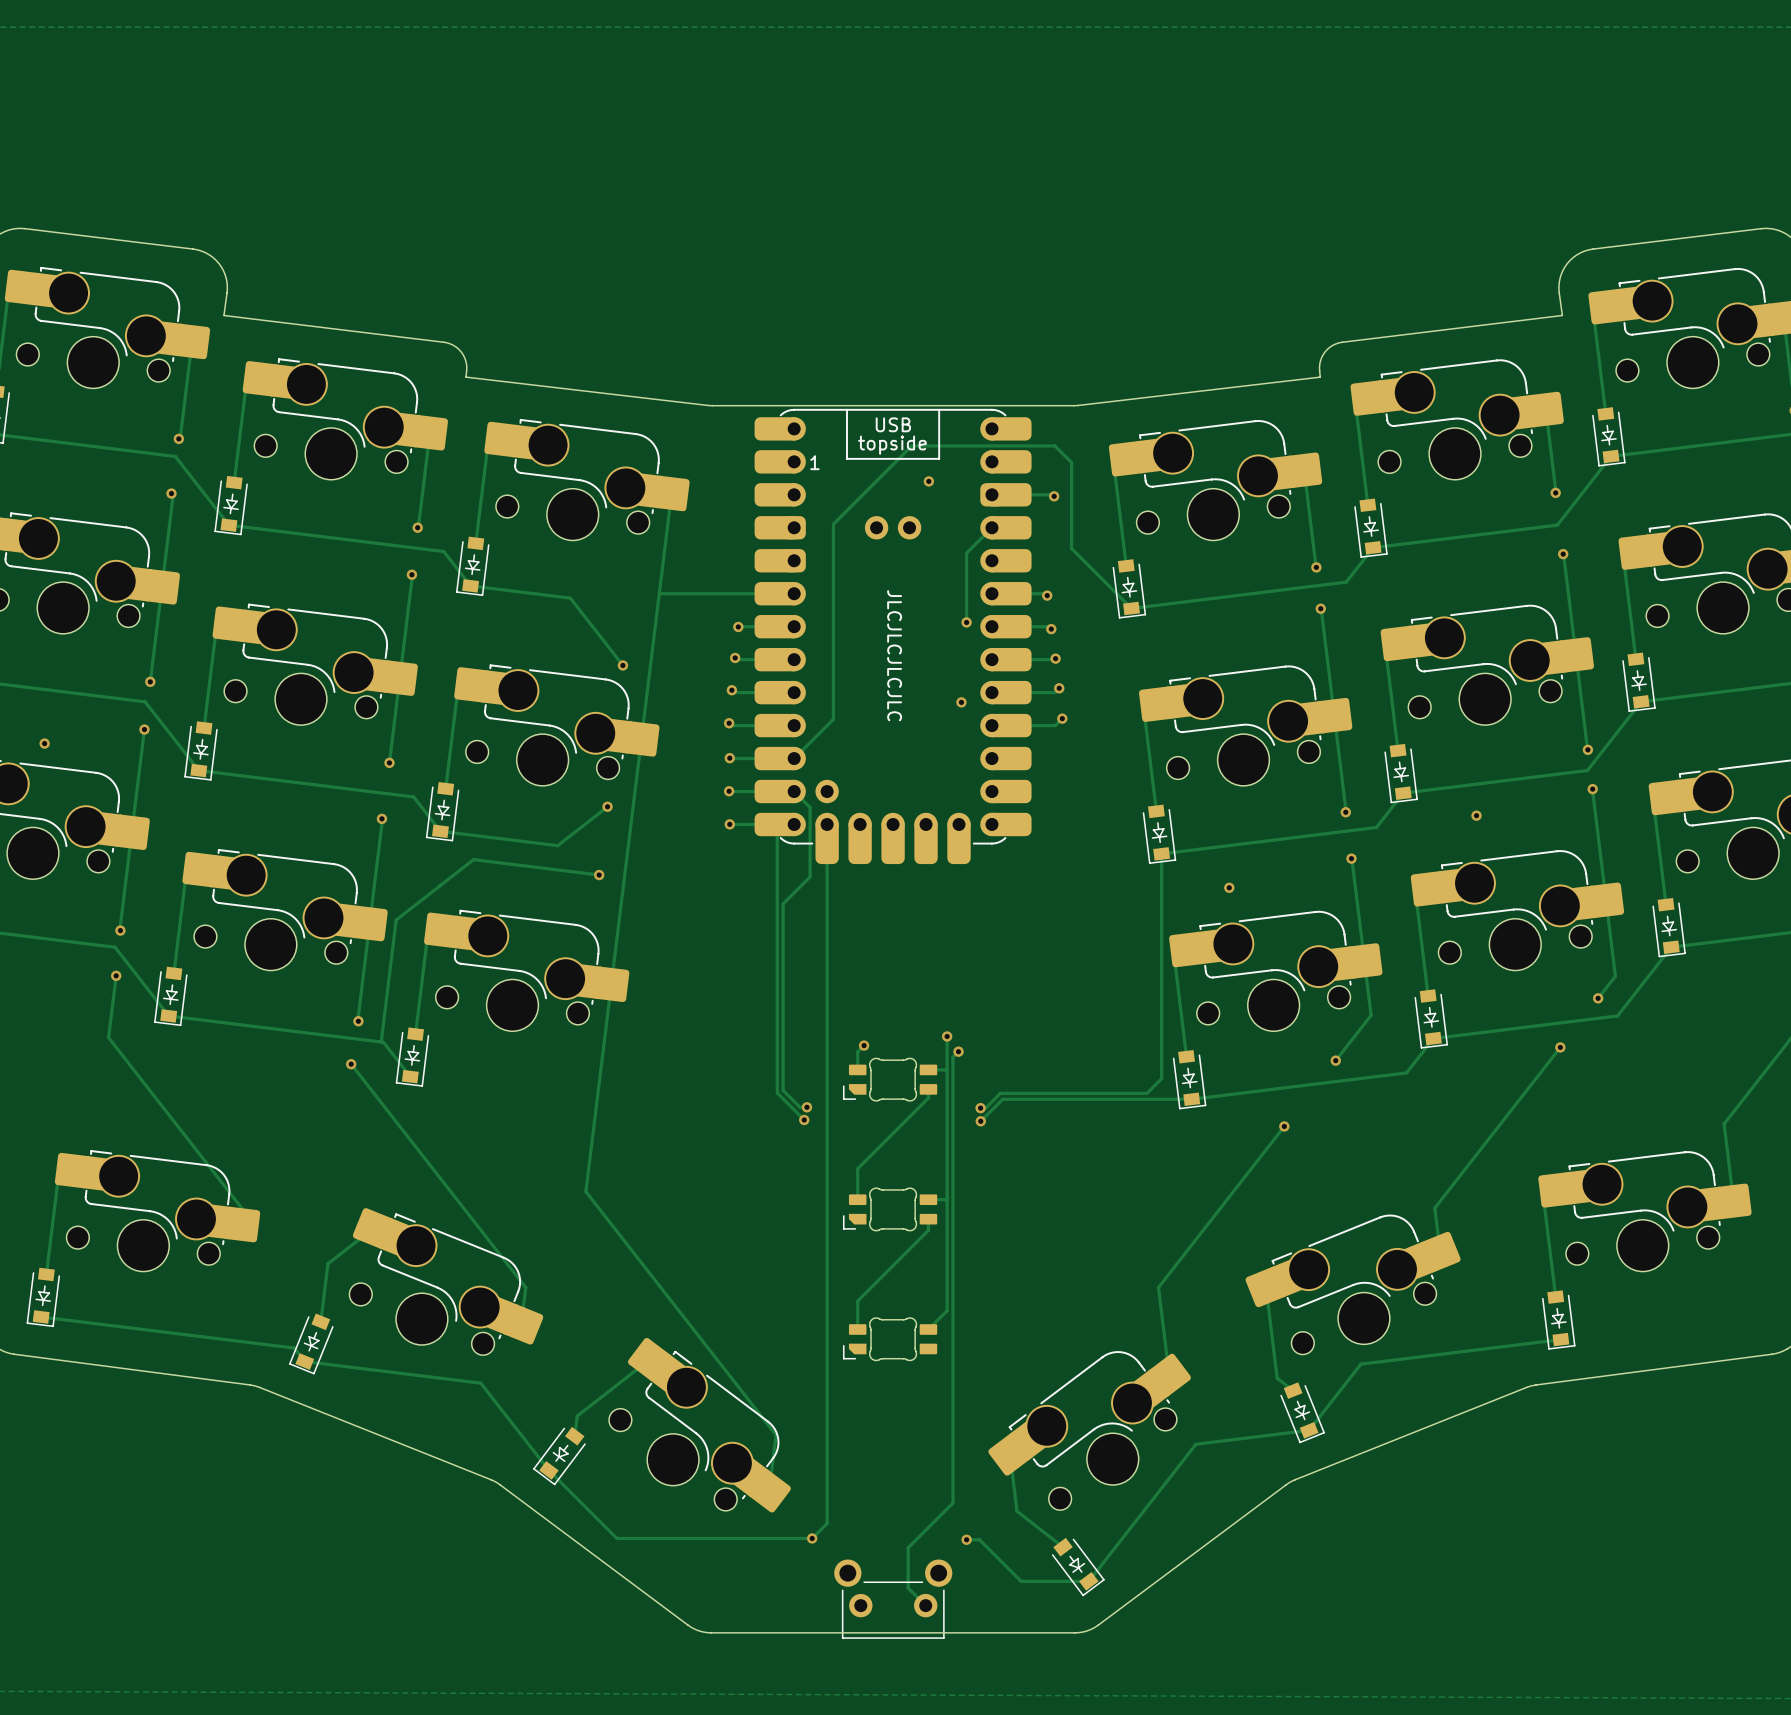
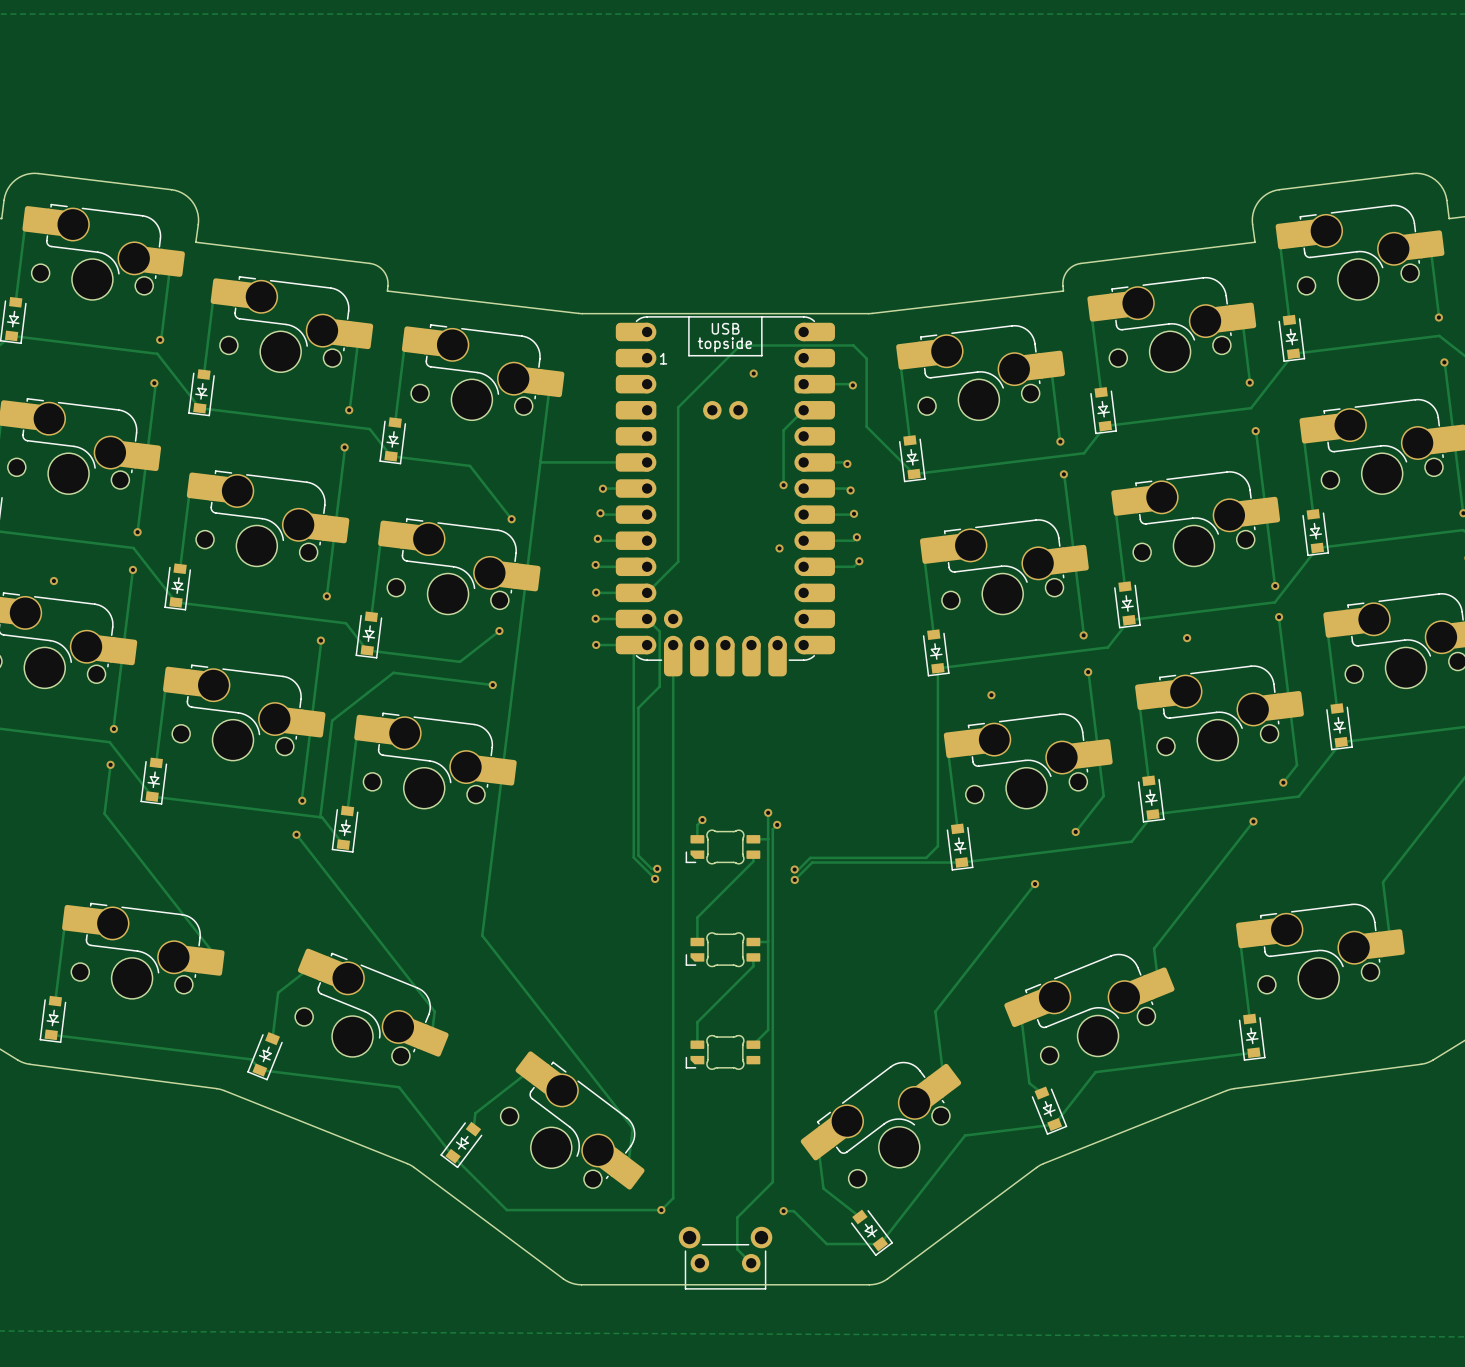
text: JLCJLCJLCJLC (894, 655) -> none

